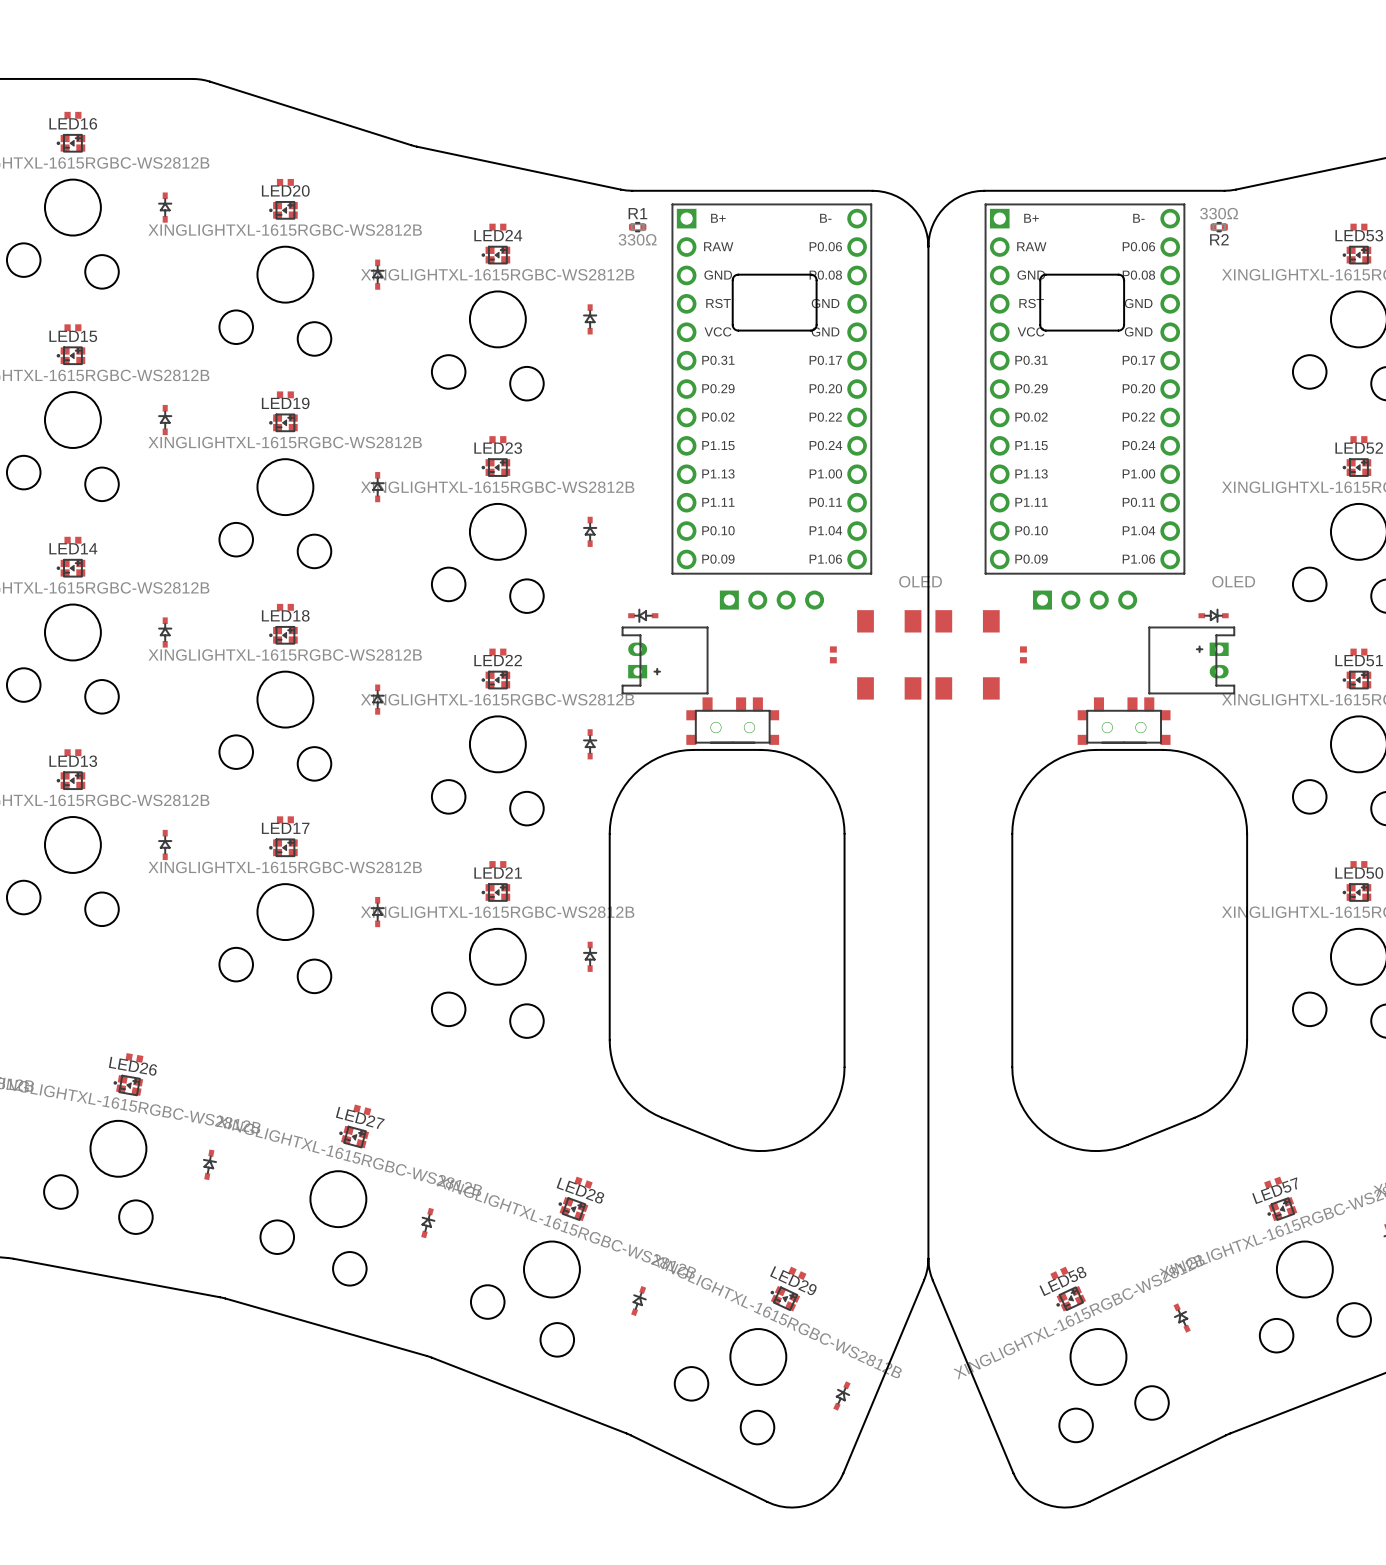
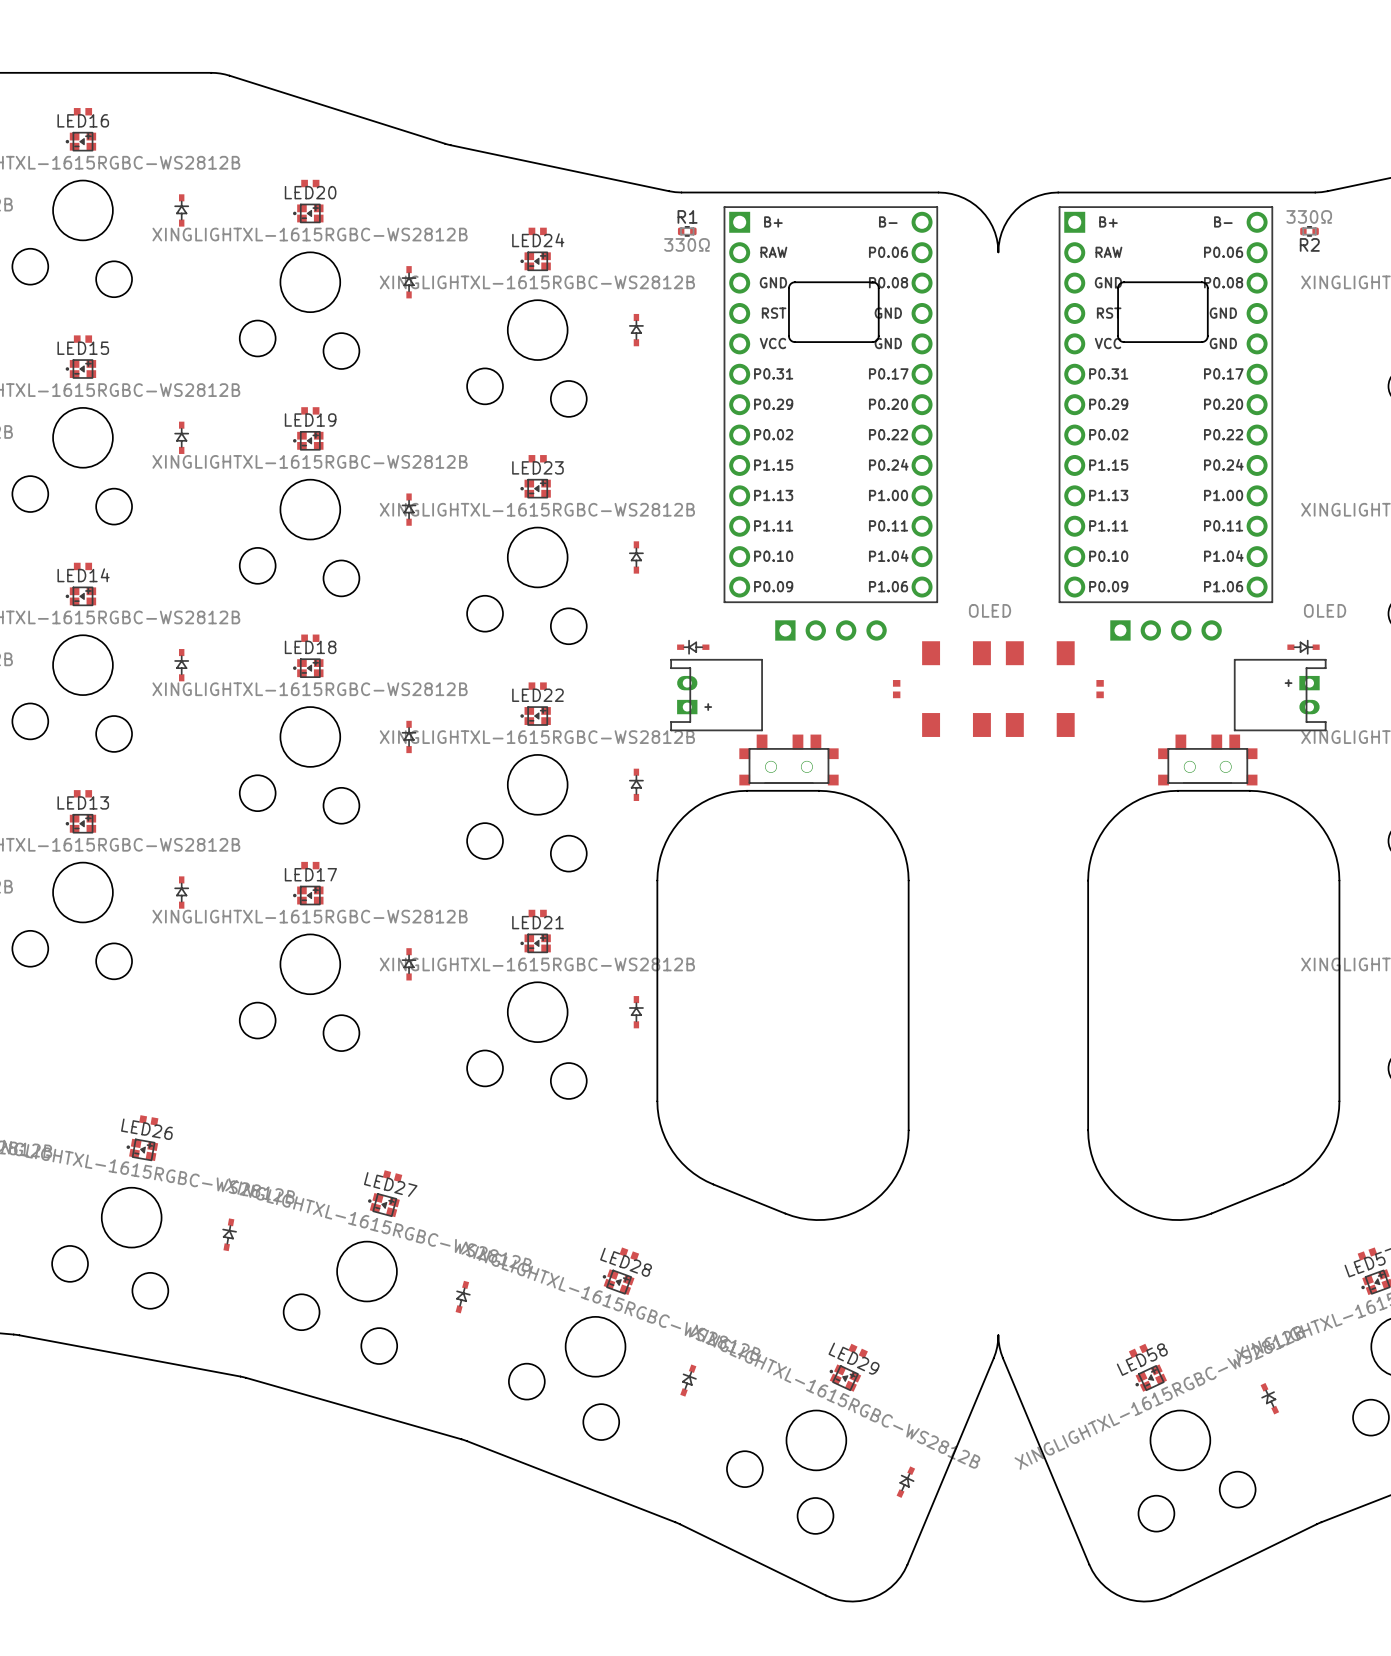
board edge: (928, 246) (928, 1258) -> none

